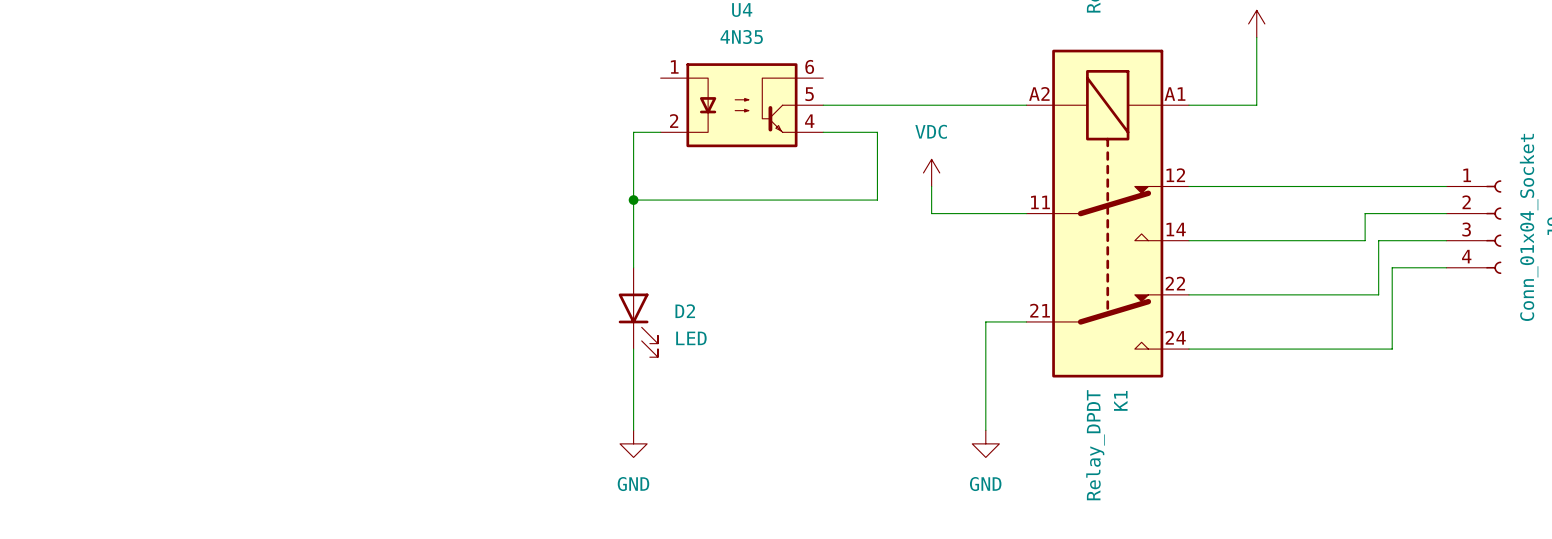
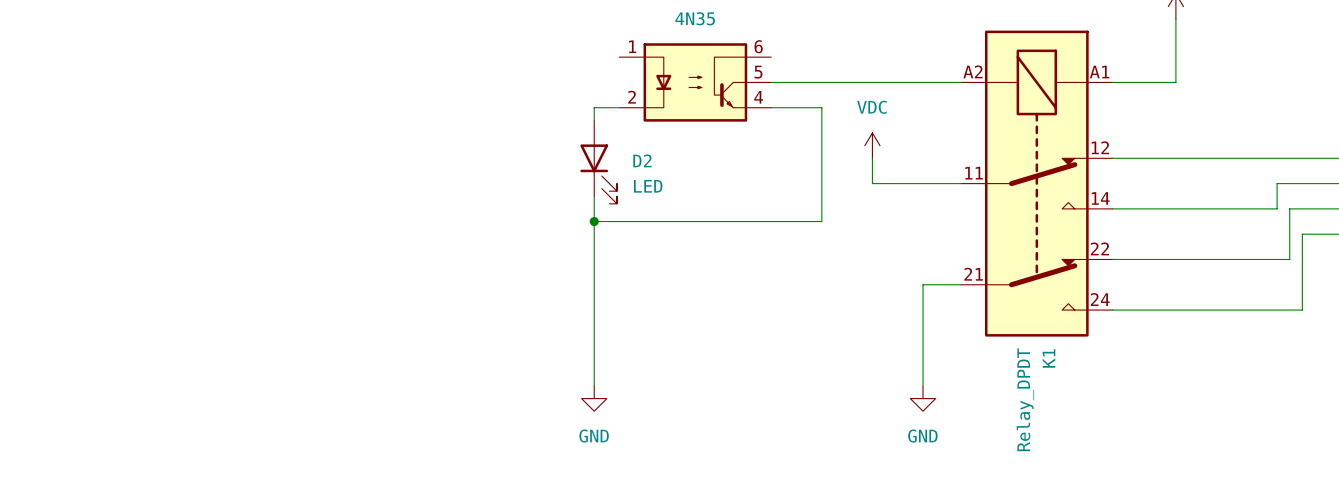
wire: (633, 200) (877, 200) -> (594, 221) (821, 221) (821, 170)
junction position: (633, 200) -> (594, 221)
D2 position: (638, 312) -> (598, 162)

